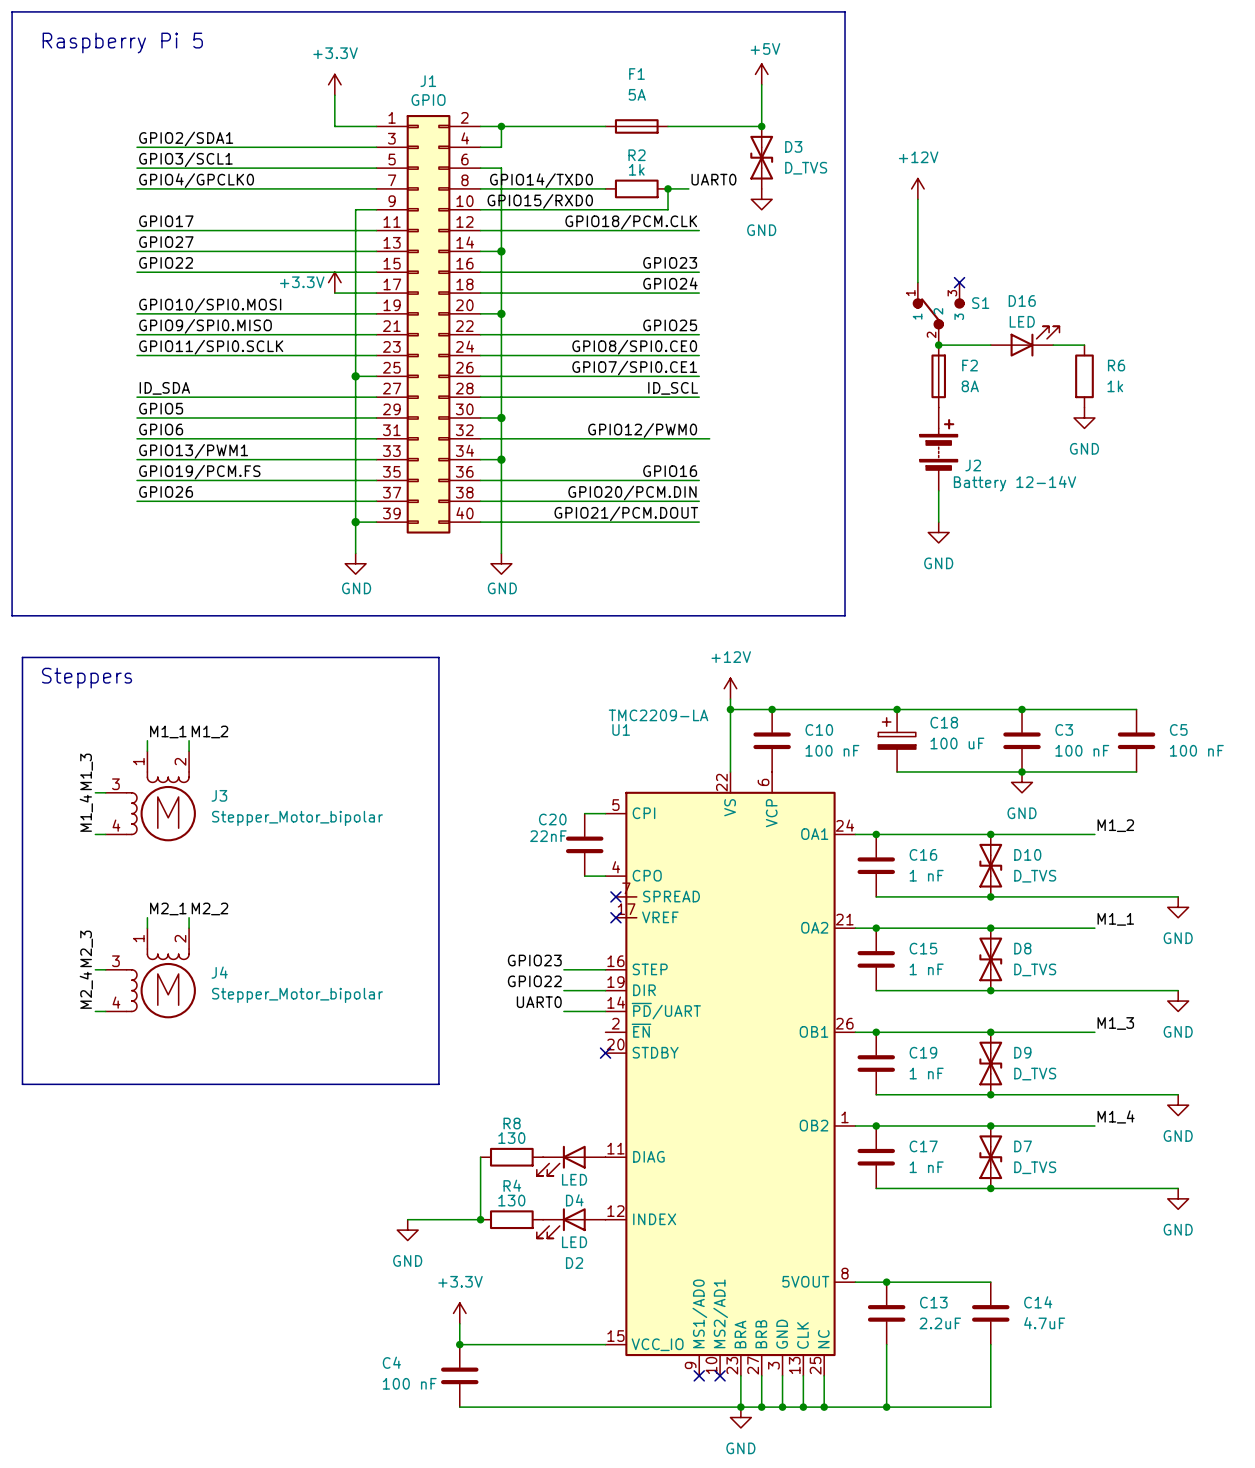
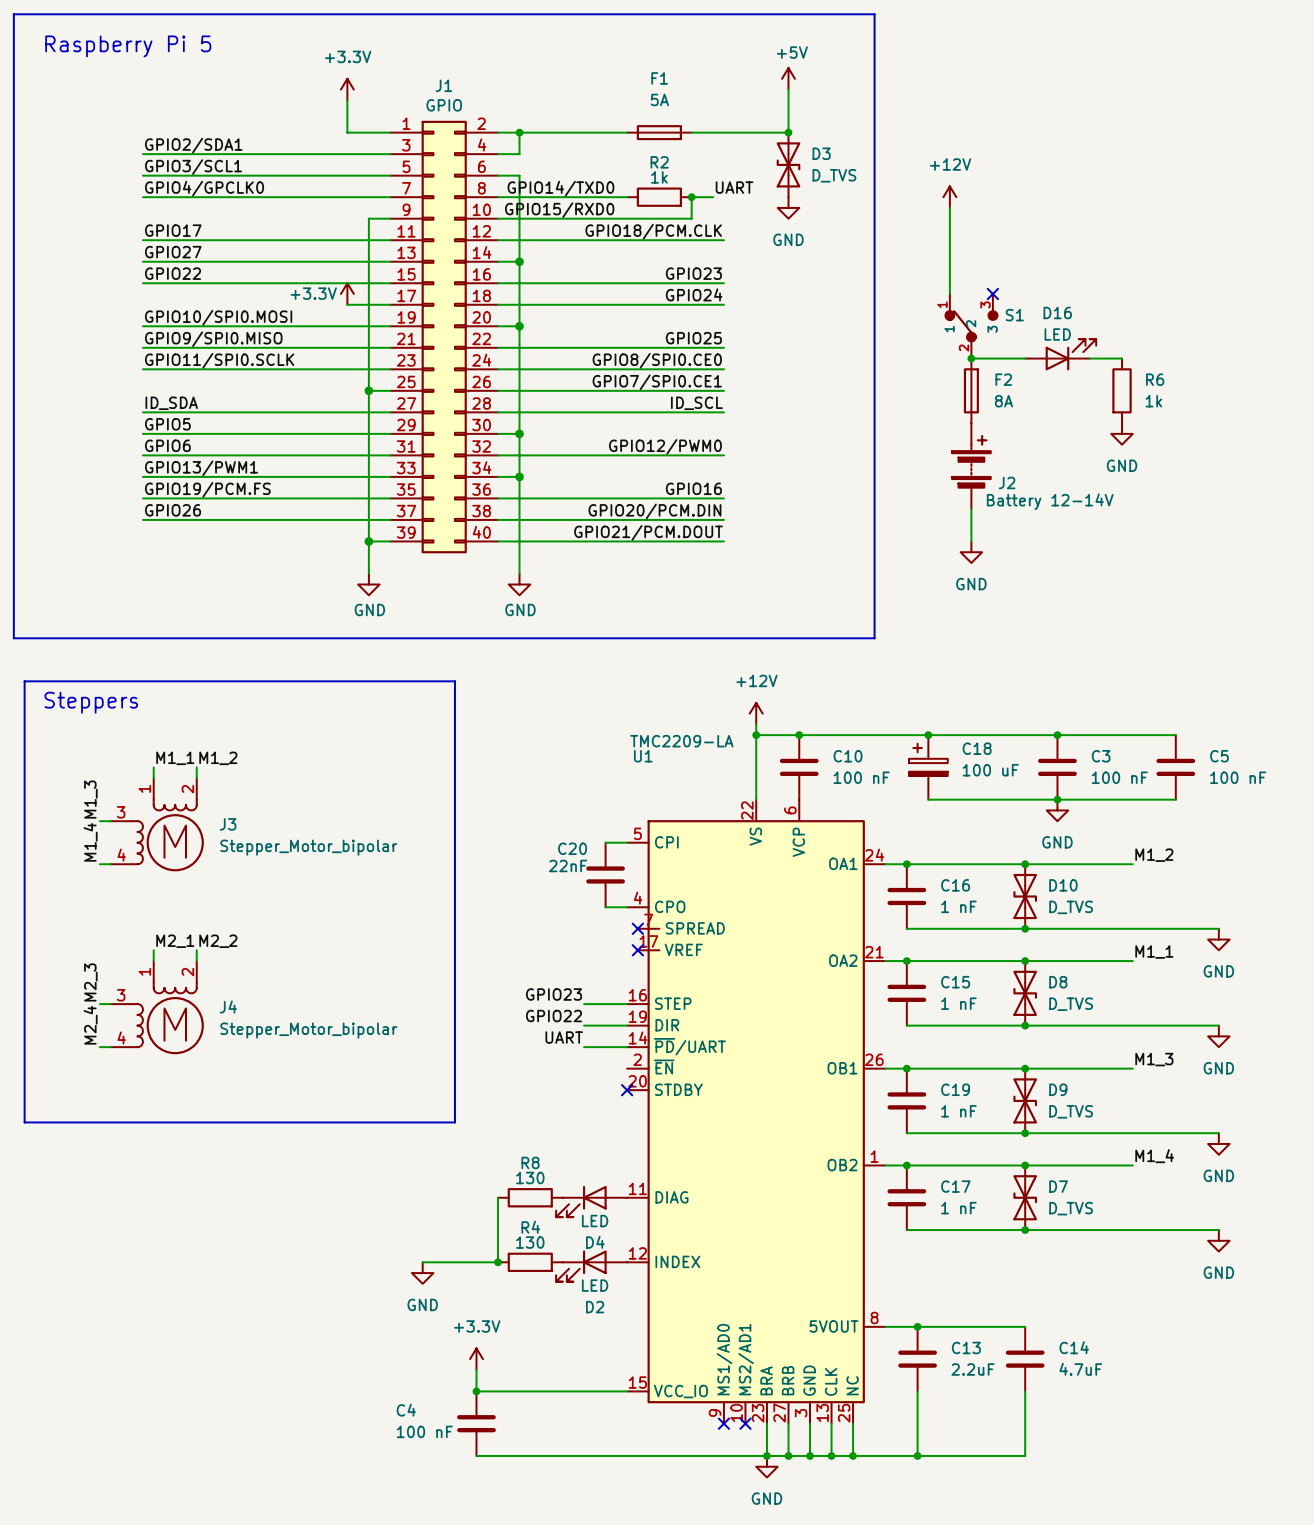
label: UART0 (713, 179) -> UART (734, 187)
wire: (699, 438) (709, 438) -> none
label: UART0 (539, 1002) -> UART (564, 1037)

